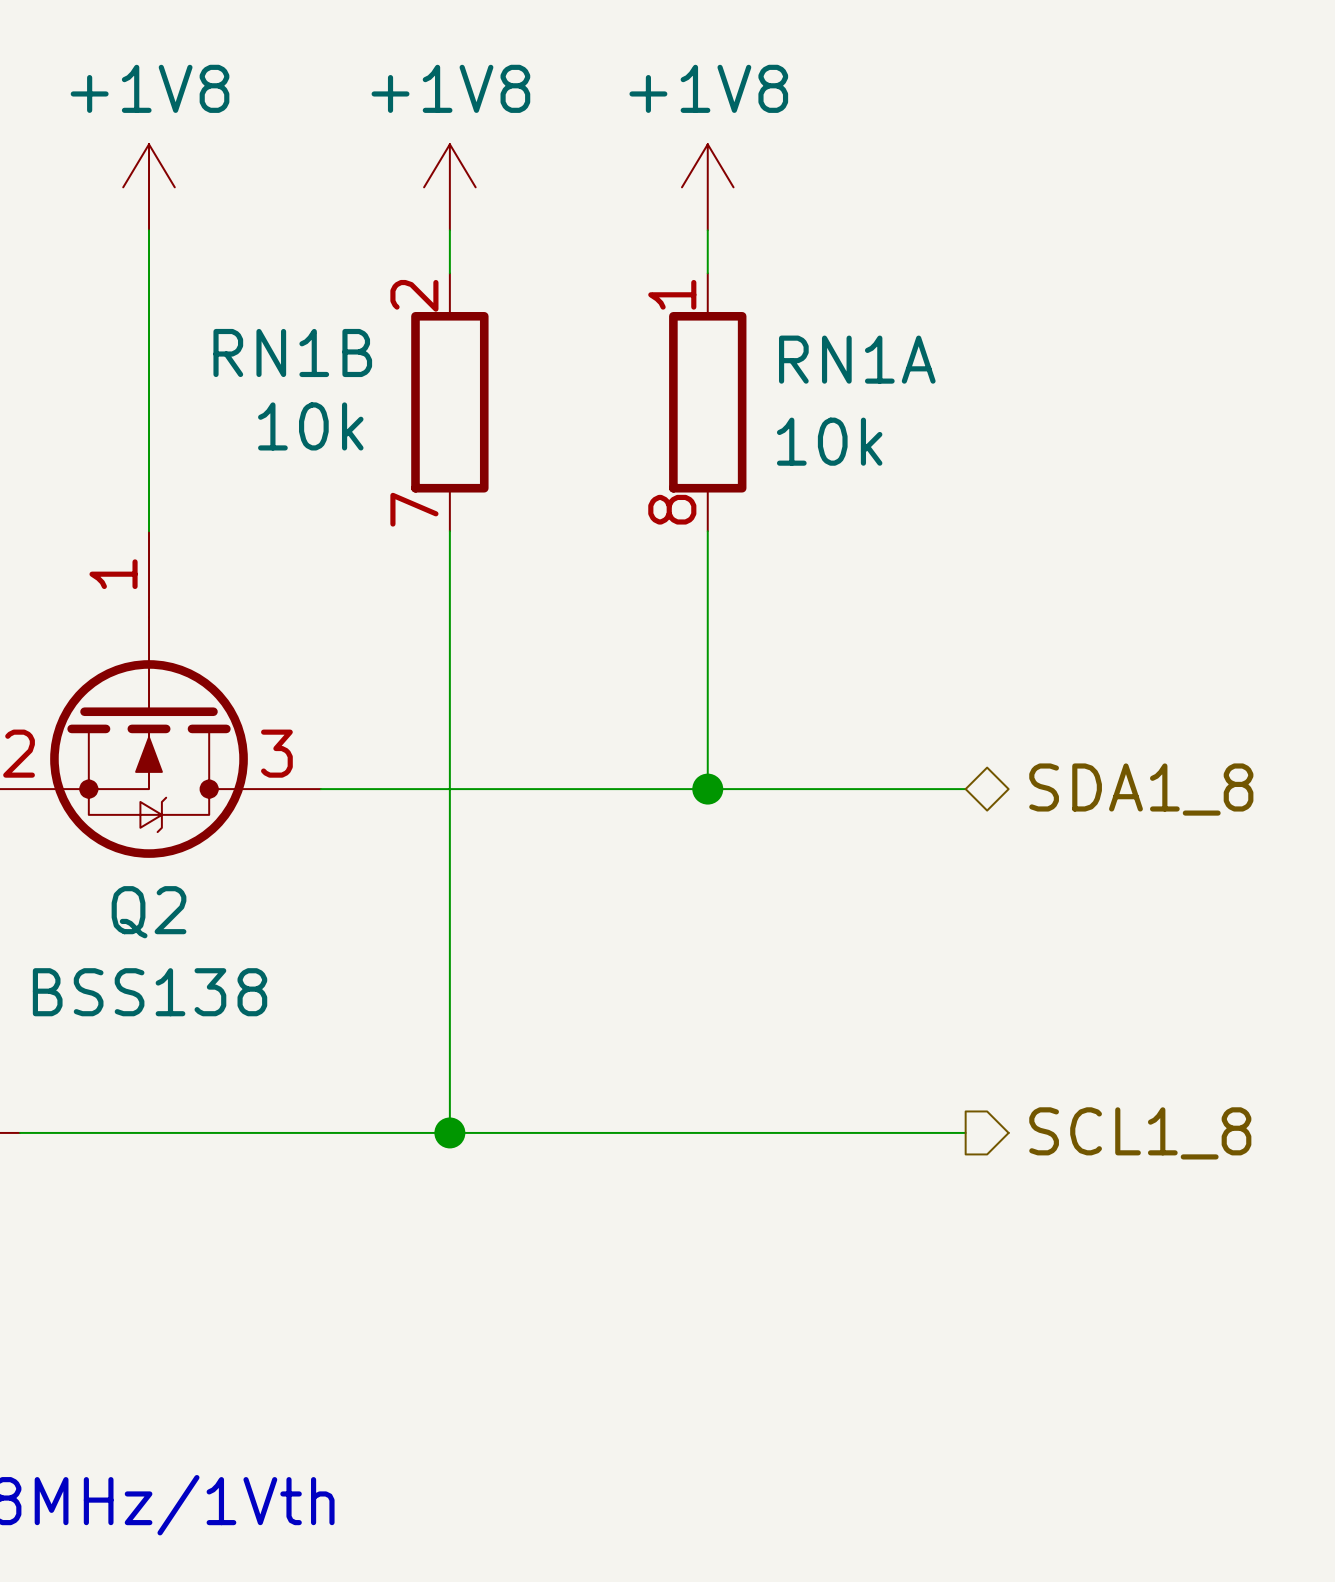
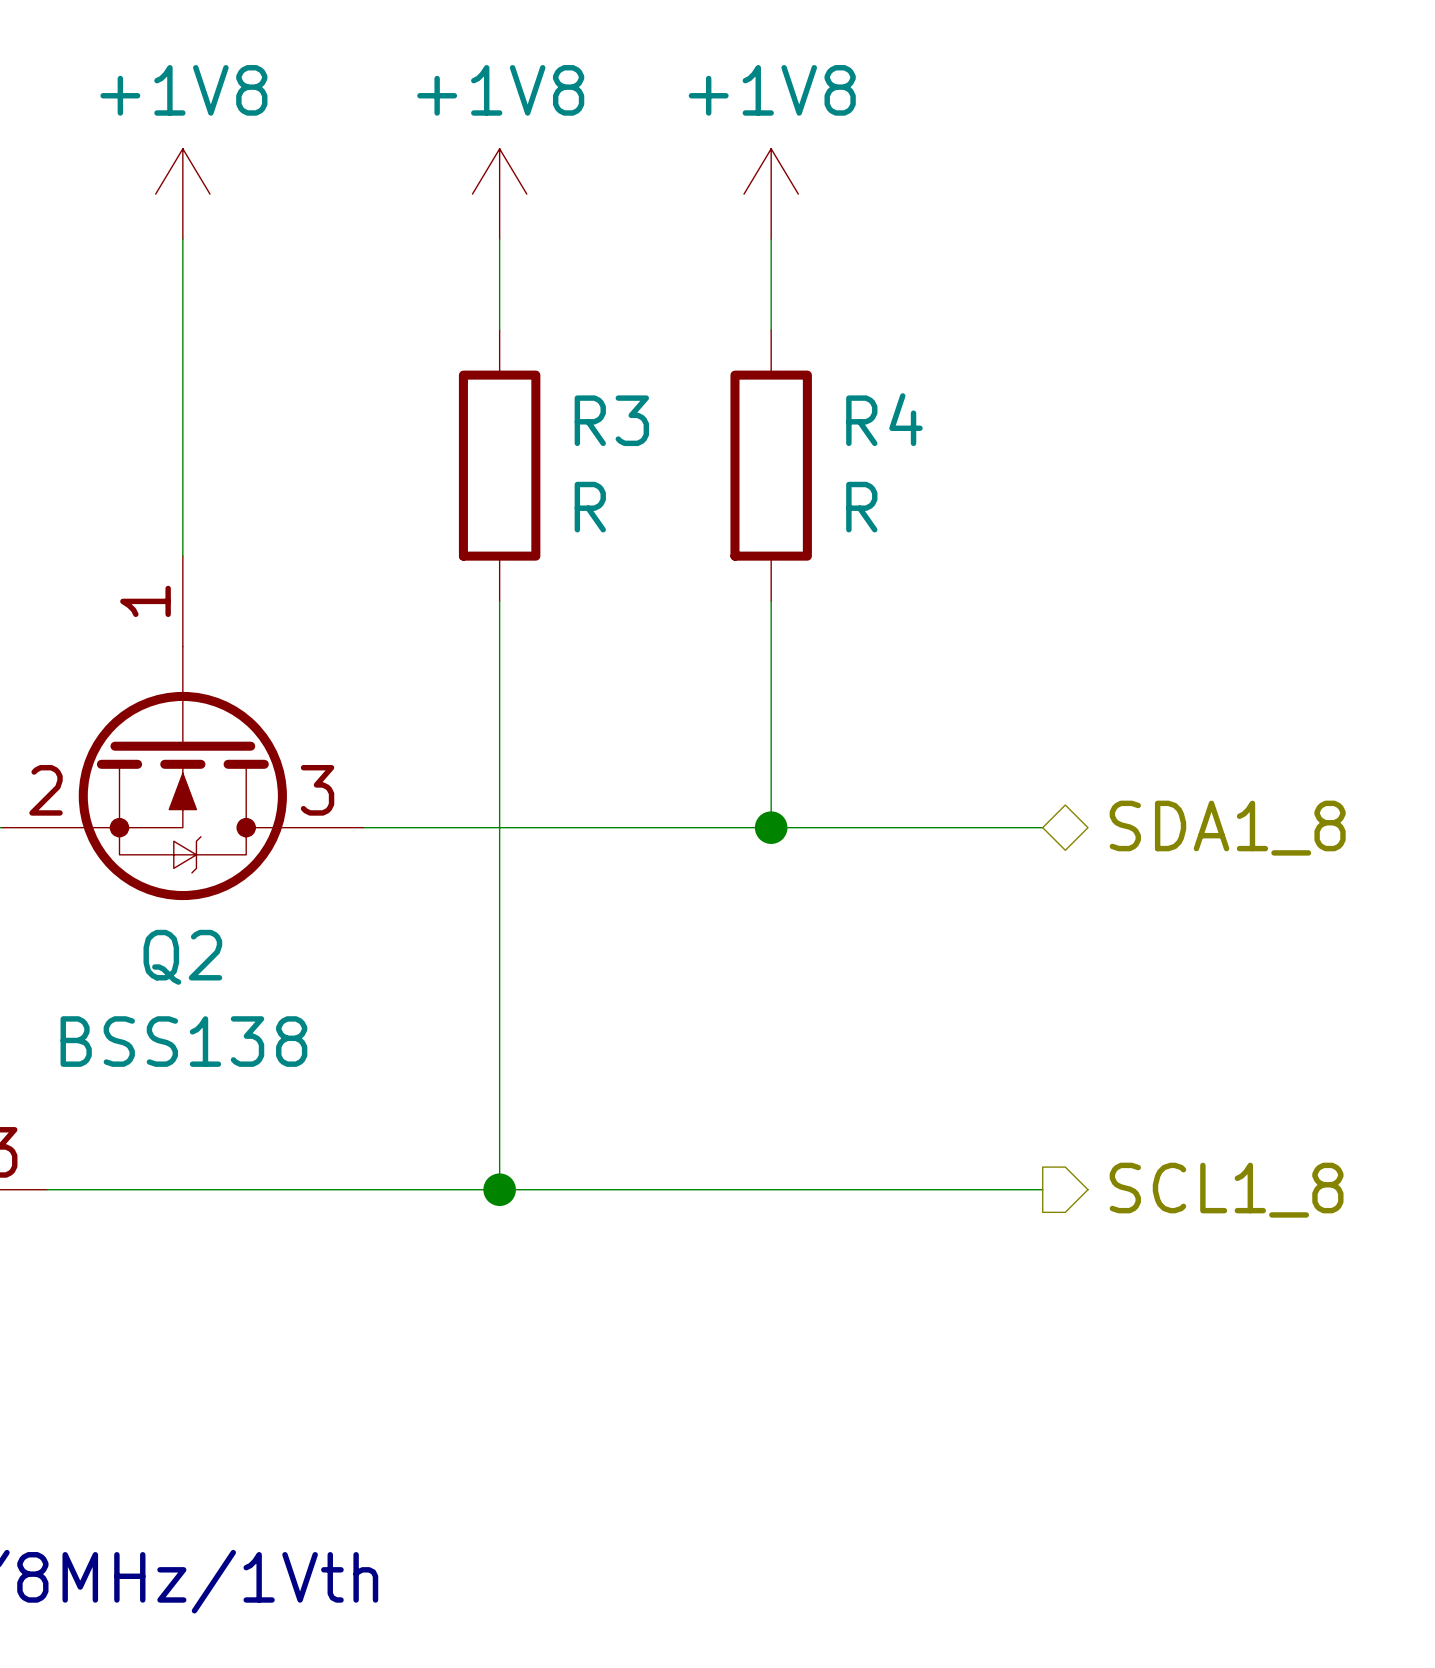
RN1B: 10k (449, 402) -> none
RN1A: 10k (707, 402) -> none
R3: none -> R (499, 465)
R4: none -> R (771, 465)

